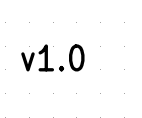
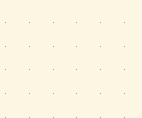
text: v1.0 (52, 57) -> none

